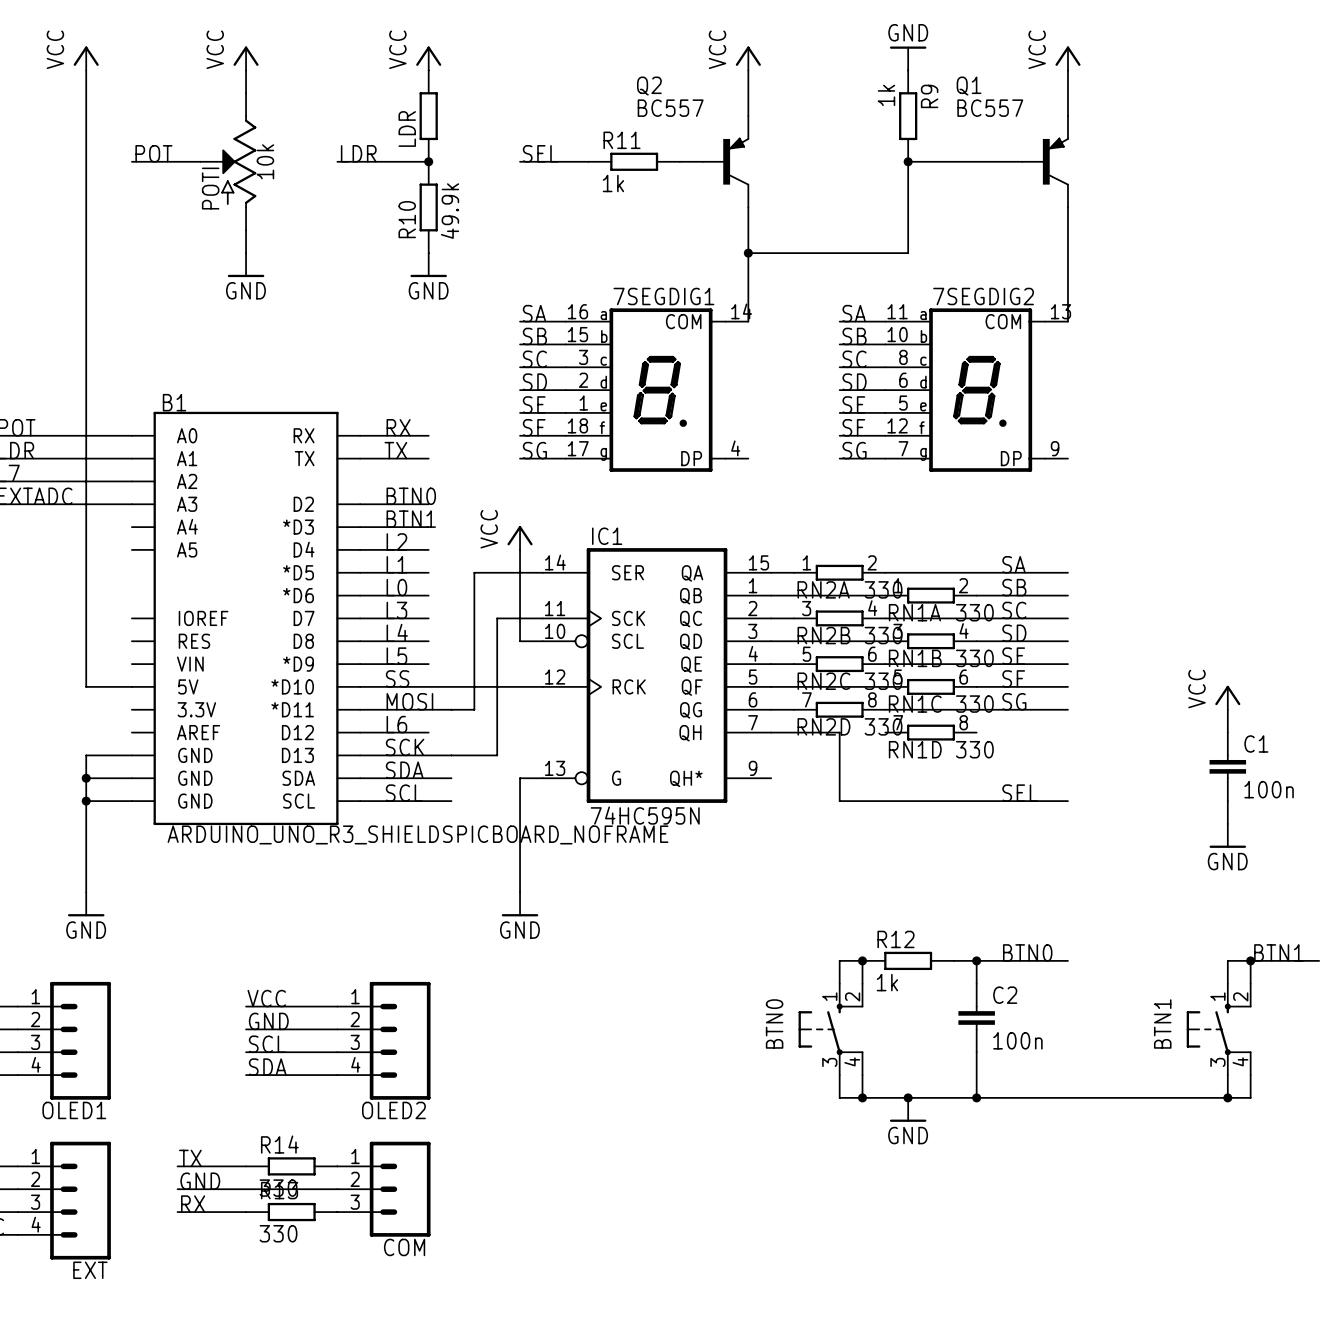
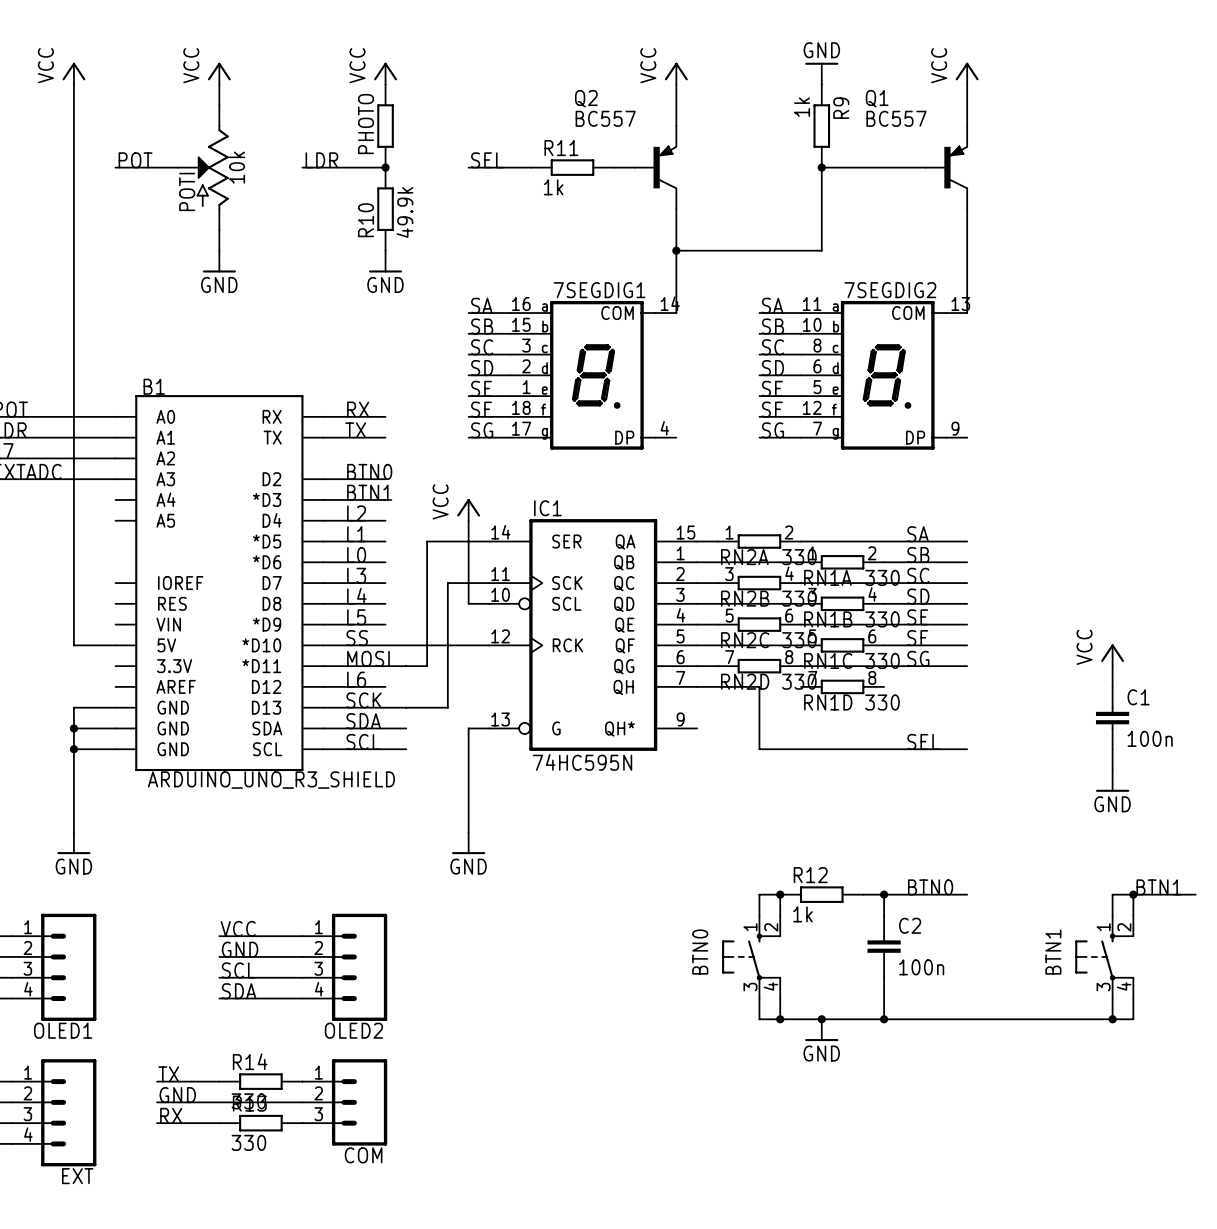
LDR name: LDR (407, 128) -> PHOTO (366, 124)
B1 value: ARDUINO_UNO_R3_SHIELDSPICBOARD_NOFRAME (418, 834) -> ARDUINO_UNO_R3_SHIELD (271, 780)

